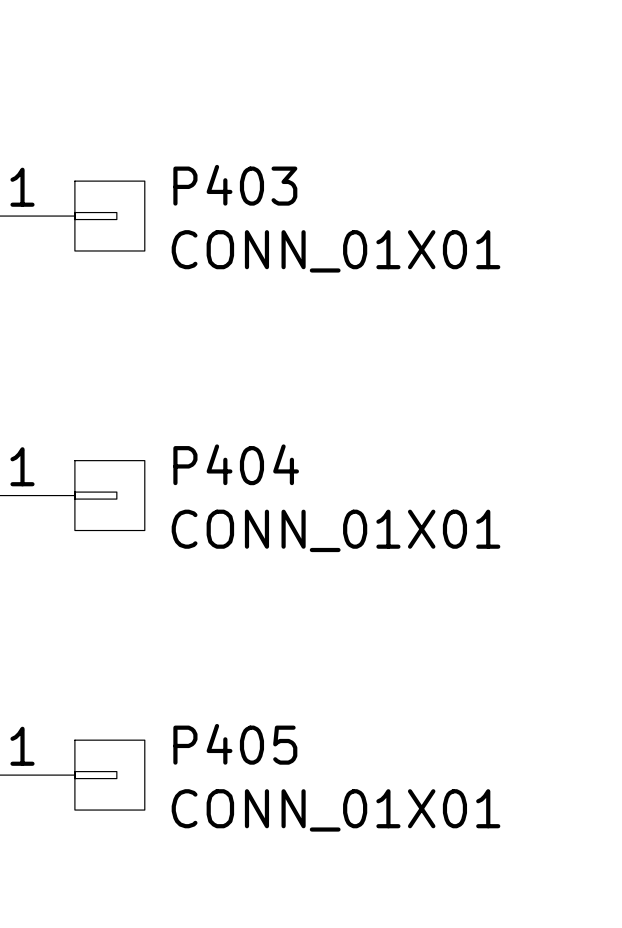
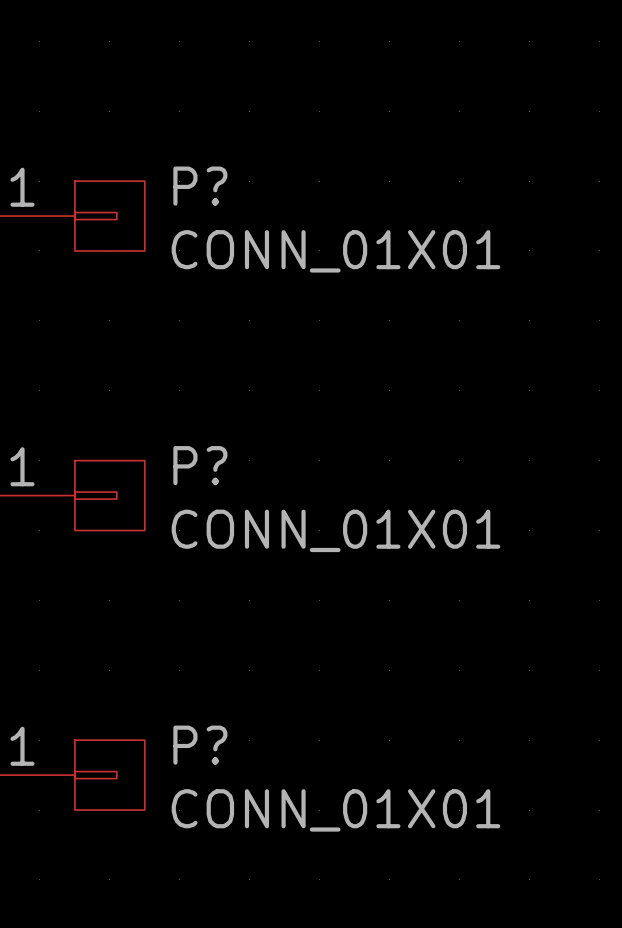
P403 name: P403 (235, 185) -> P? (200, 186)
P404 name: P404 (236, 464) -> P? (200, 465)
P405 name: P405 (235, 744) -> P? (200, 745)

